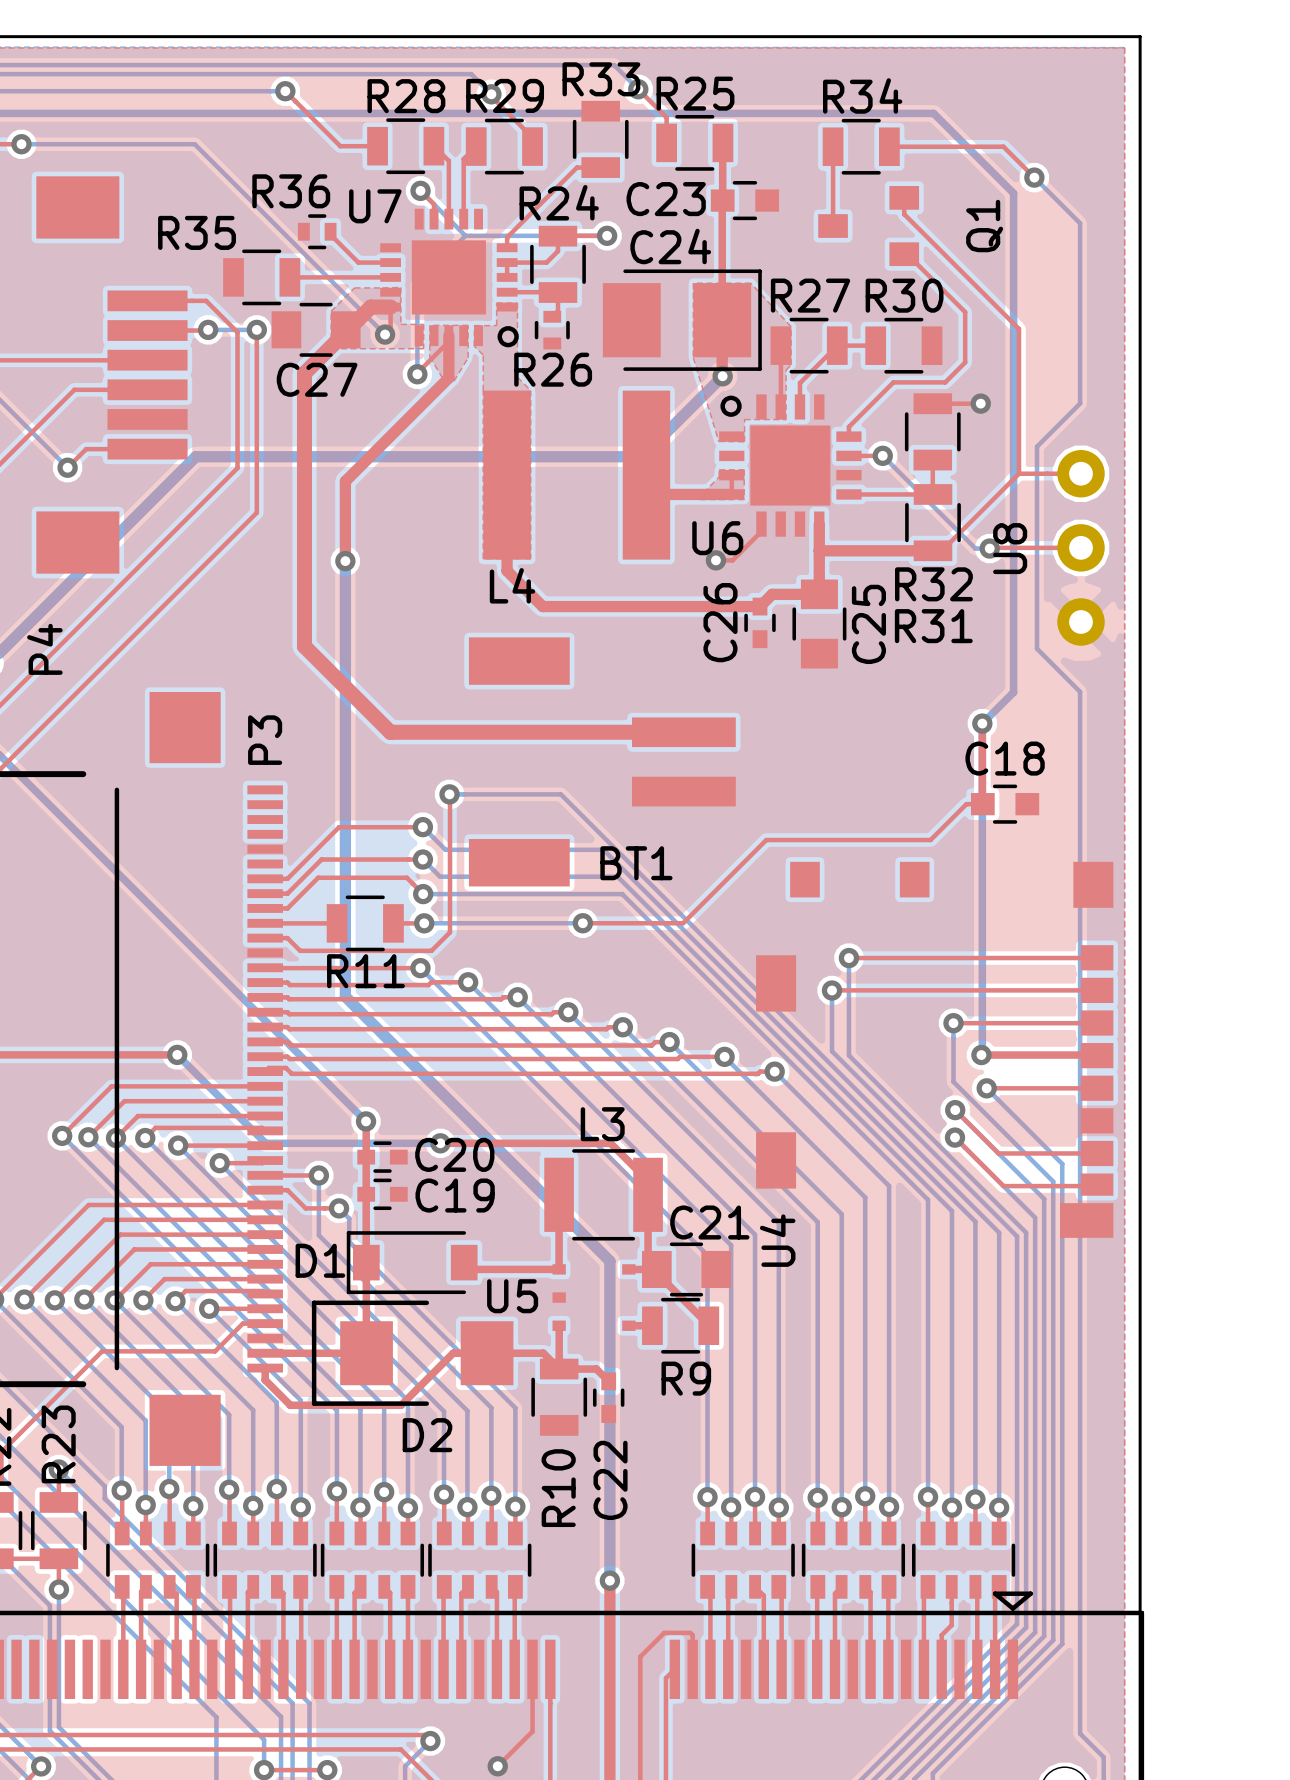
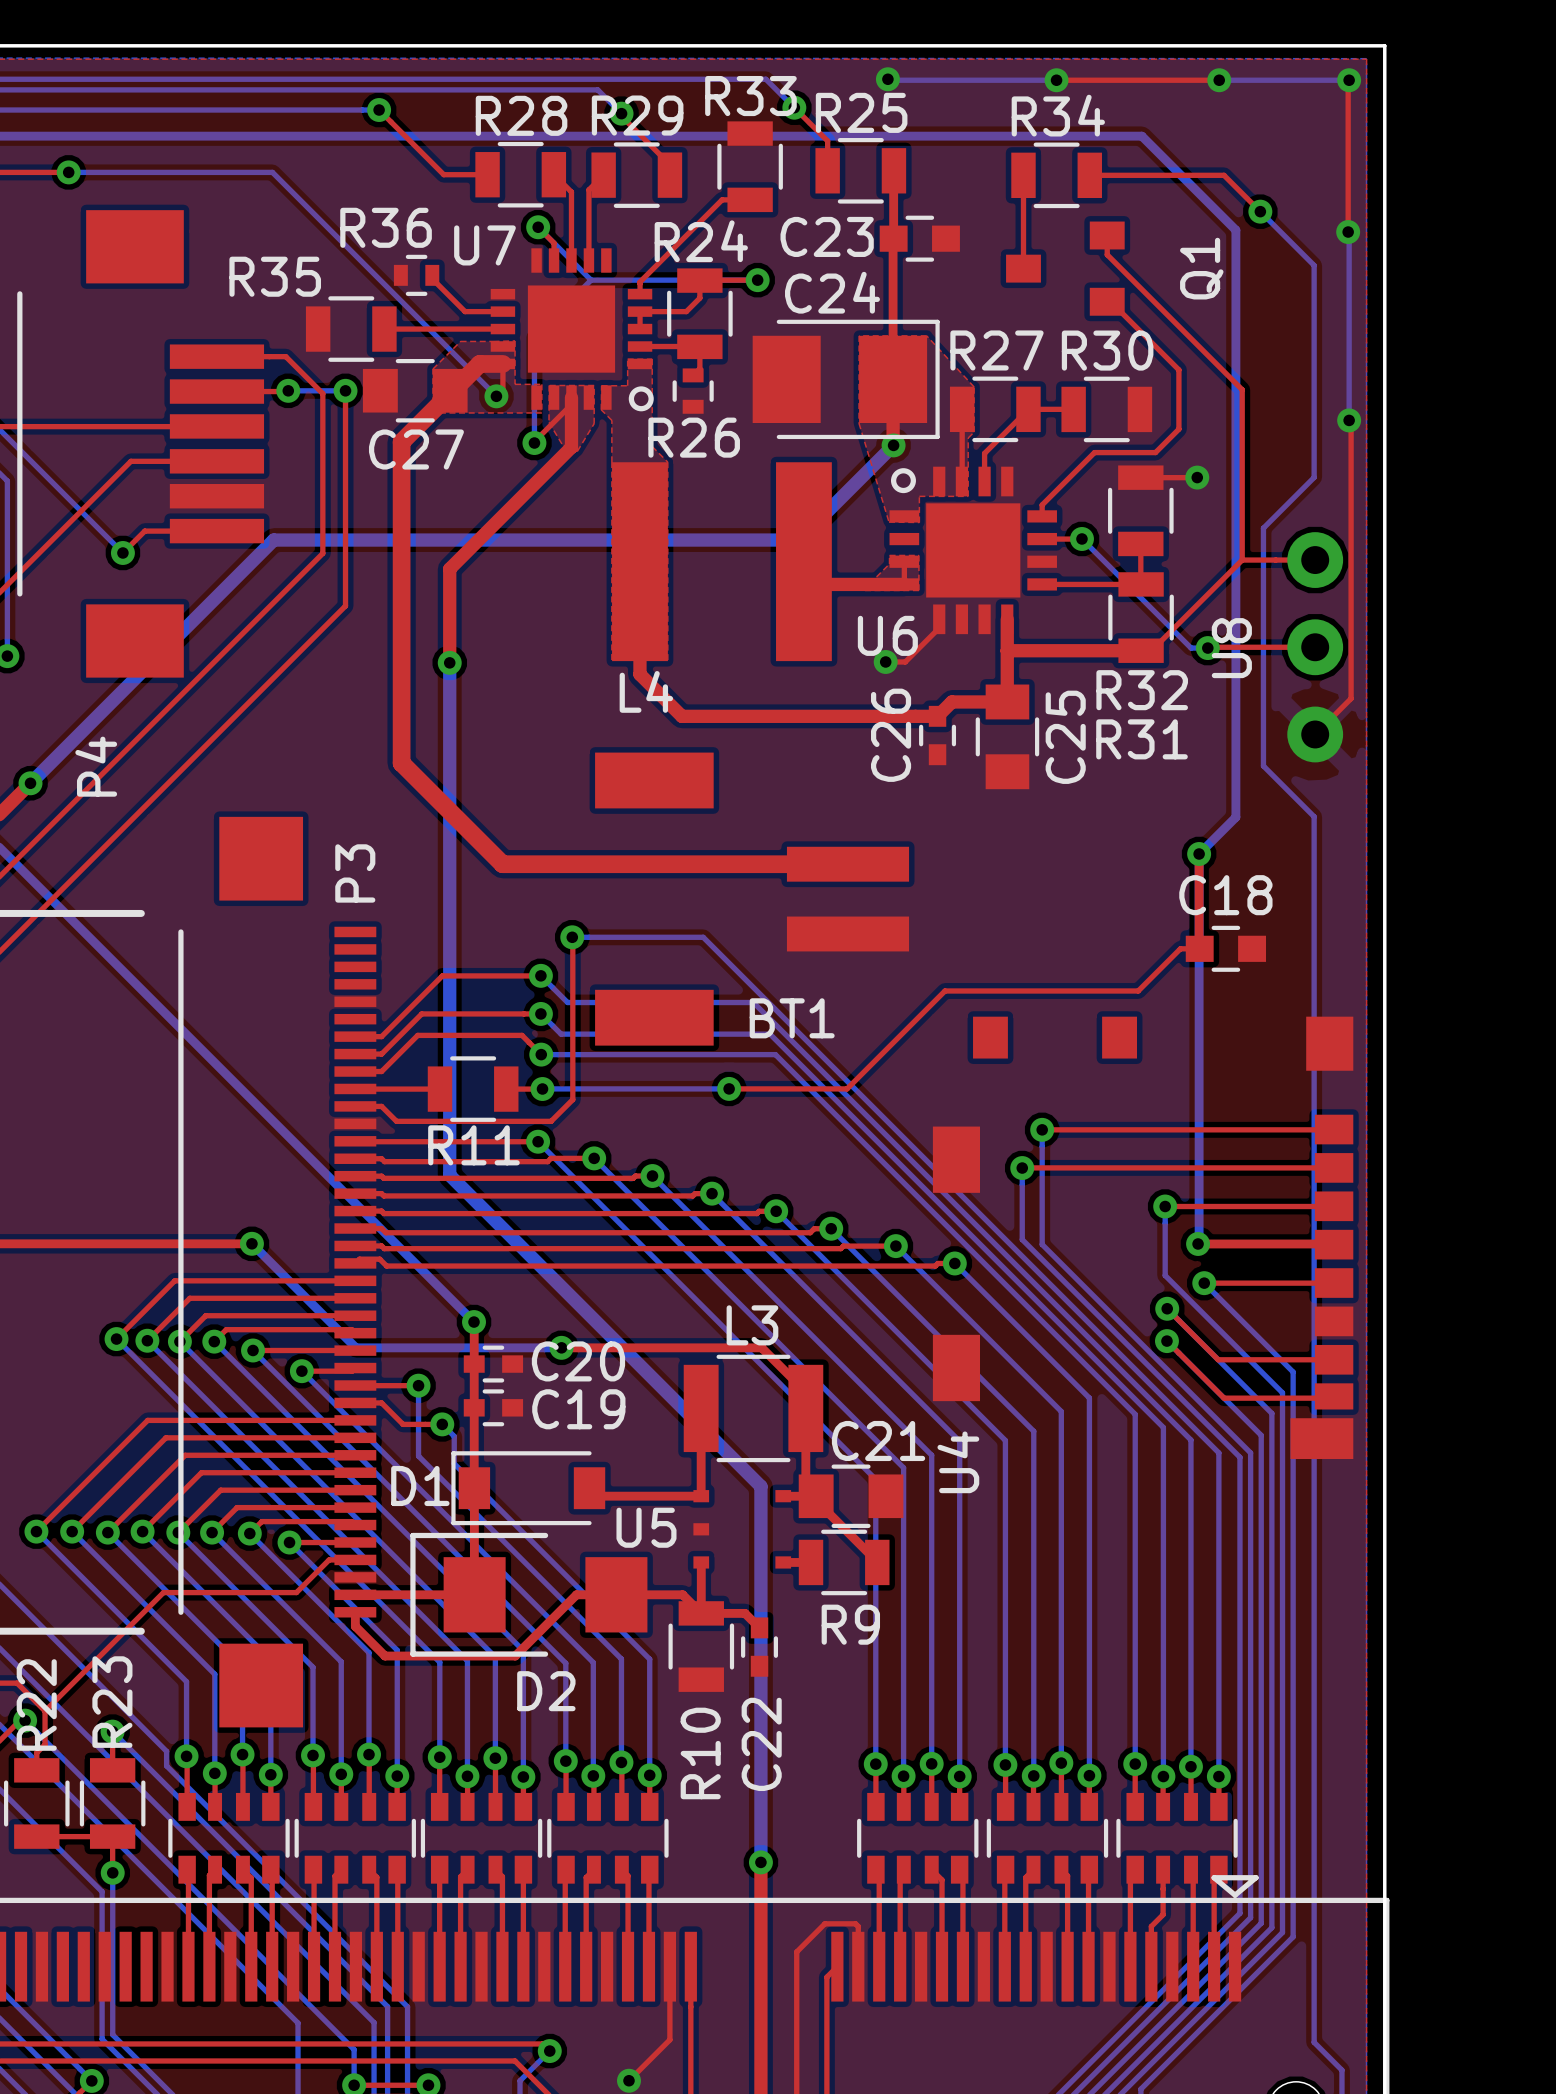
bottom track: none -> (887, 79) (1056, 80)
via: none -> (887, 79)
top track: none -> (1056, 80) (1219, 80)
via: none -> (1056, 80)
bottom track: none -> (1219, 80) (1349, 80)
via: none -> (1219, 80)
top track: none -> (1349, 80) (1348, 232)
via: none -> (1349, 80)
bottom track: none -> (1348, 232) (1349, 420)
via: none -> (1348, 232)
top track: none -> (1349, 420) (1351, 422) (1351, 698) (1315, 734)
via: none -> (1349, 420)

